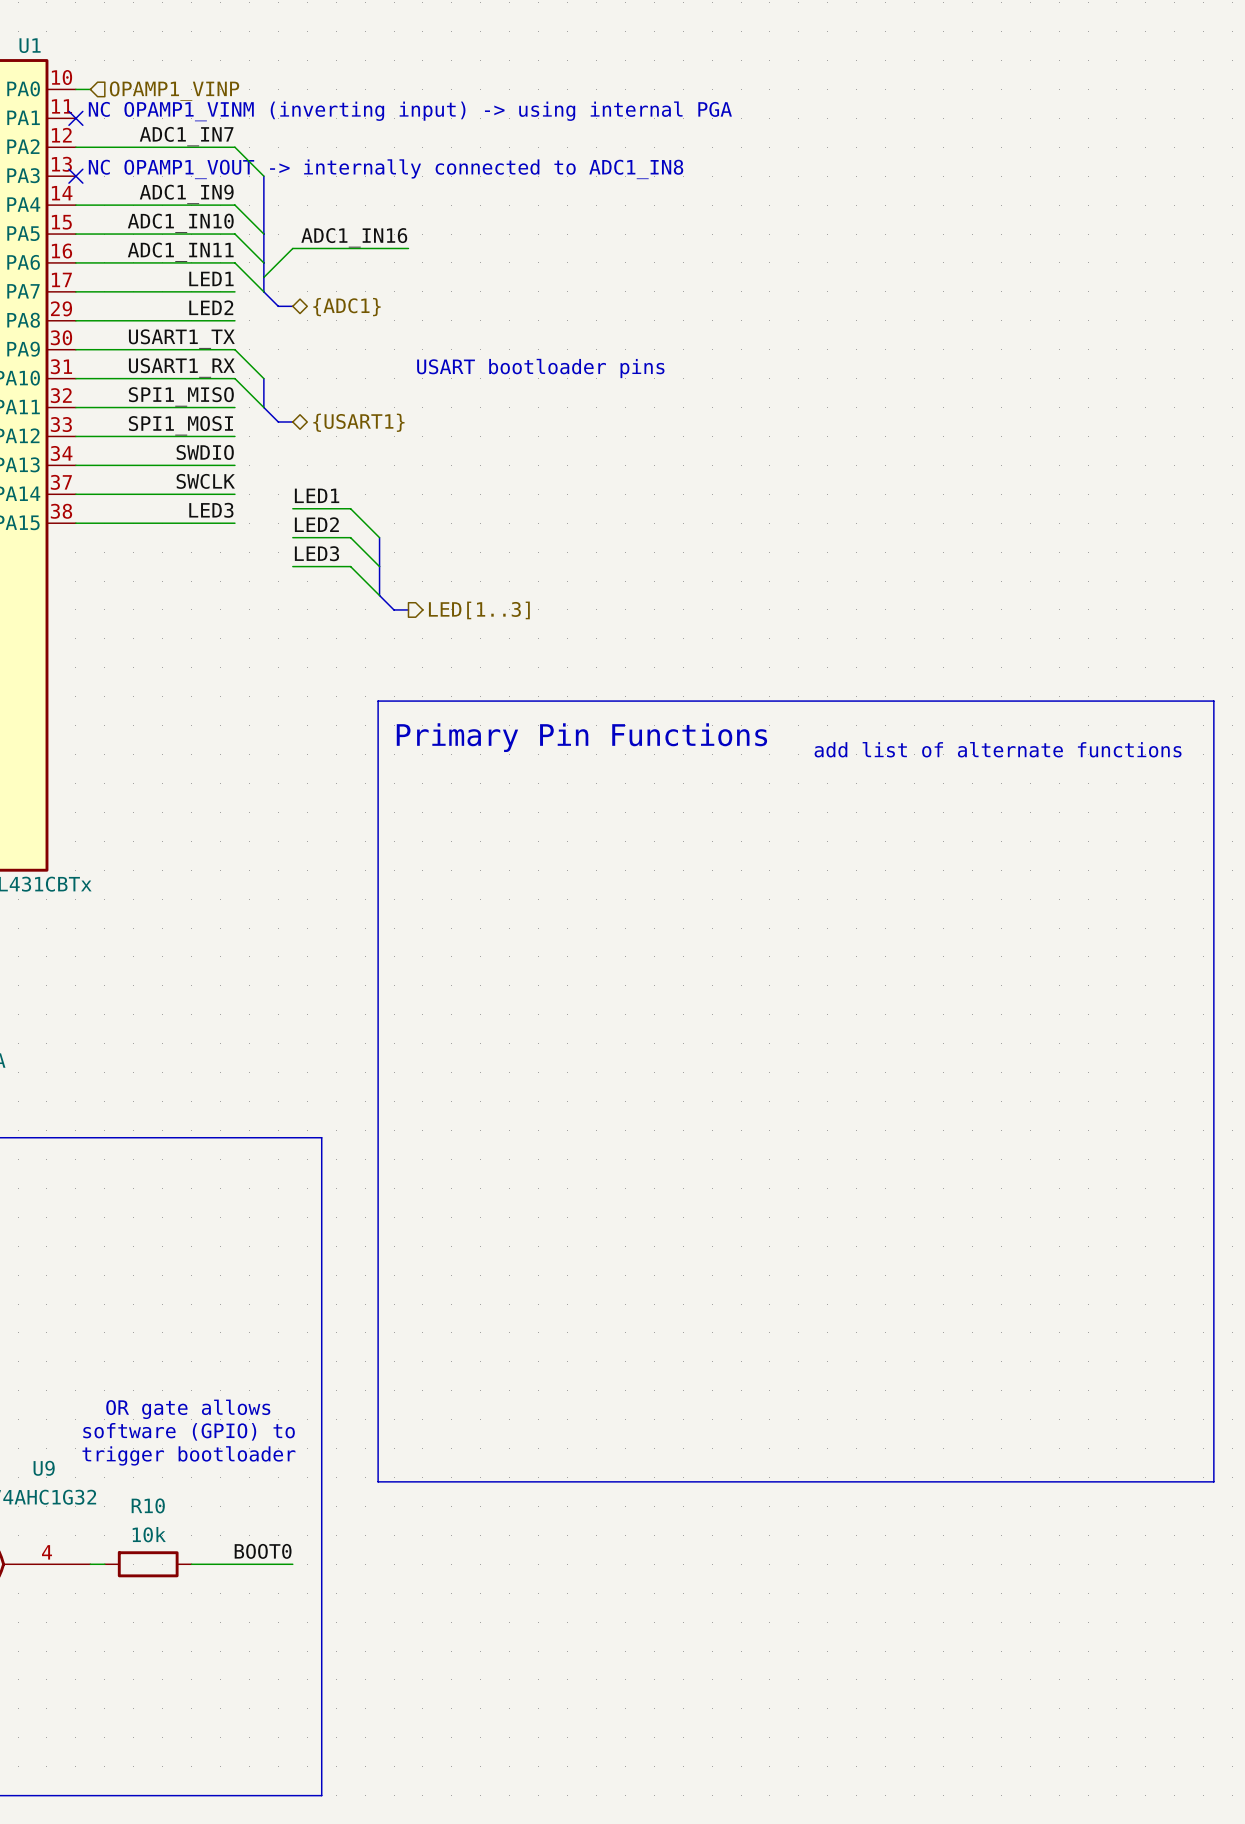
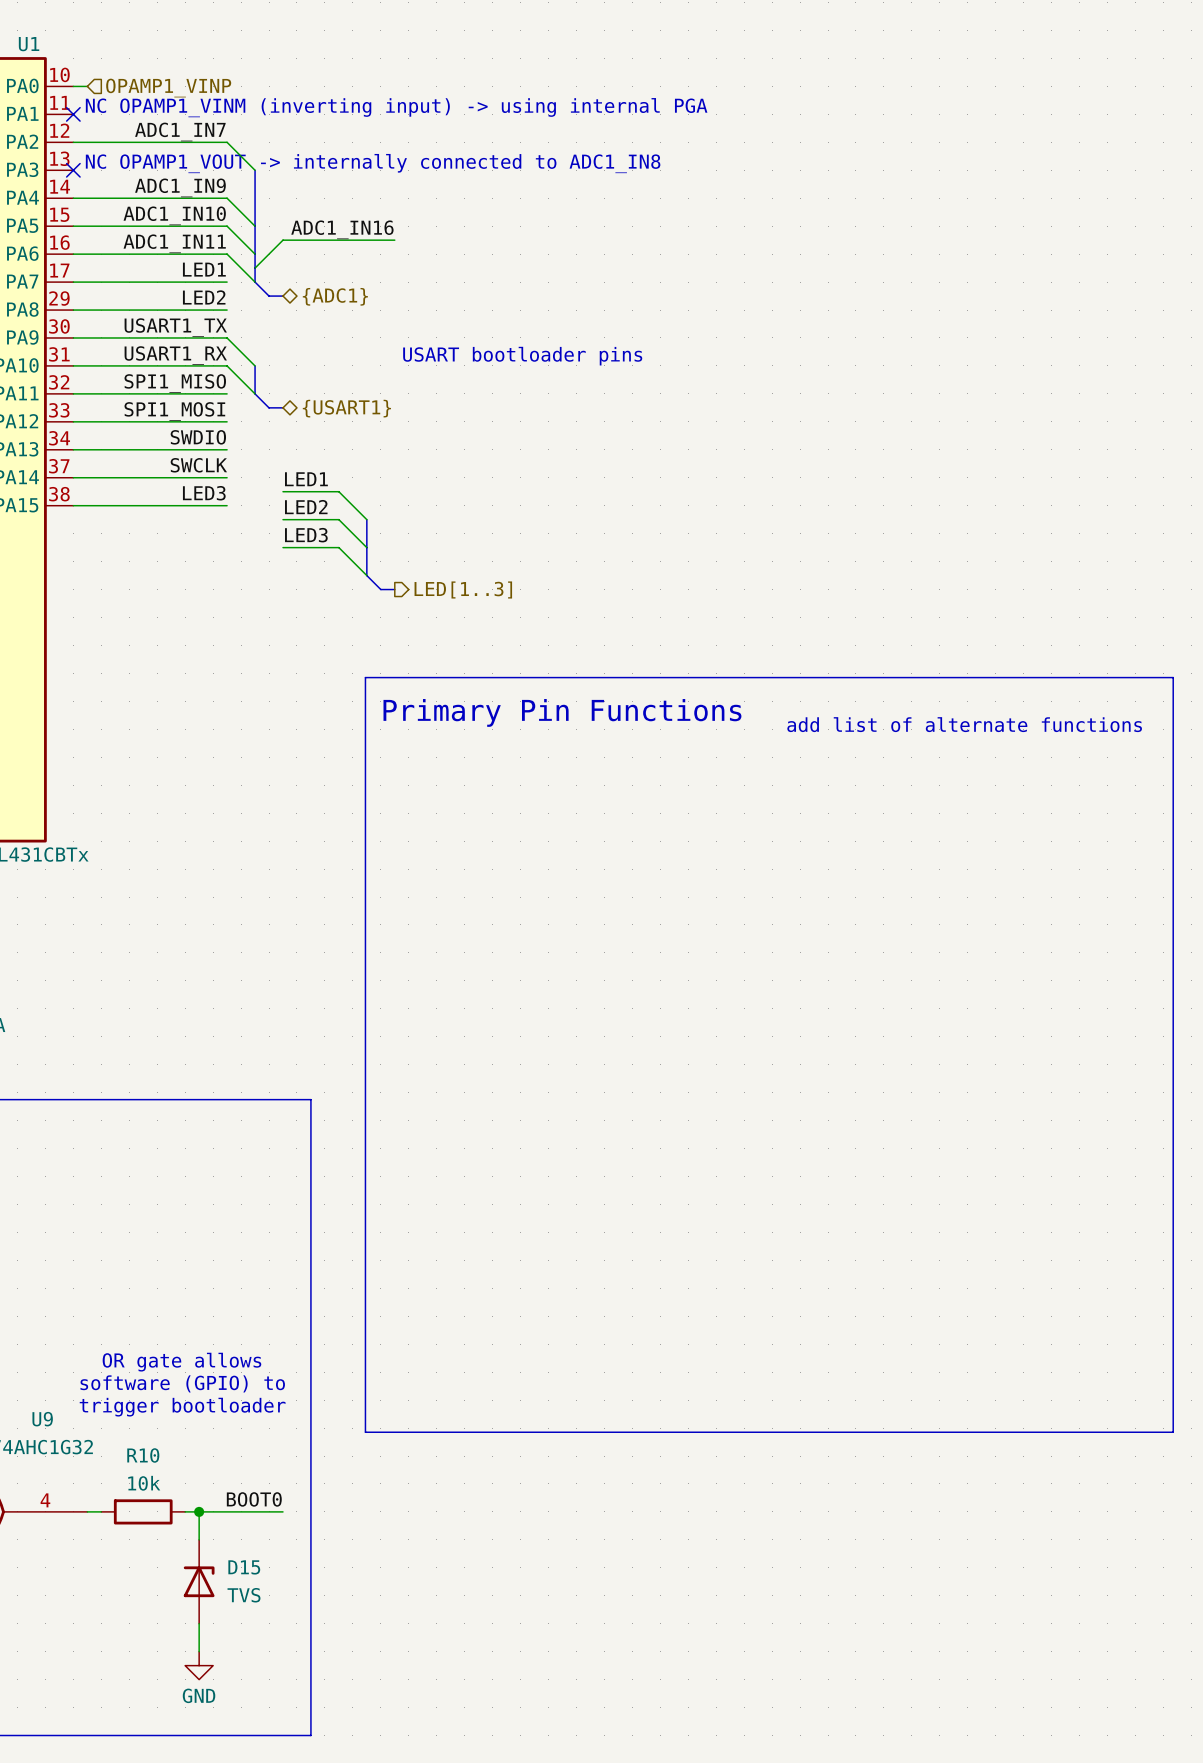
wire: none -> (199, 1511) (199, 1539)
junction: none -> (199, 1511)
D15: none -> TVS (199, 1581)
wire: none -> (199, 1623) (199, 1651)
power symbol: none -> GND (199, 1665)

